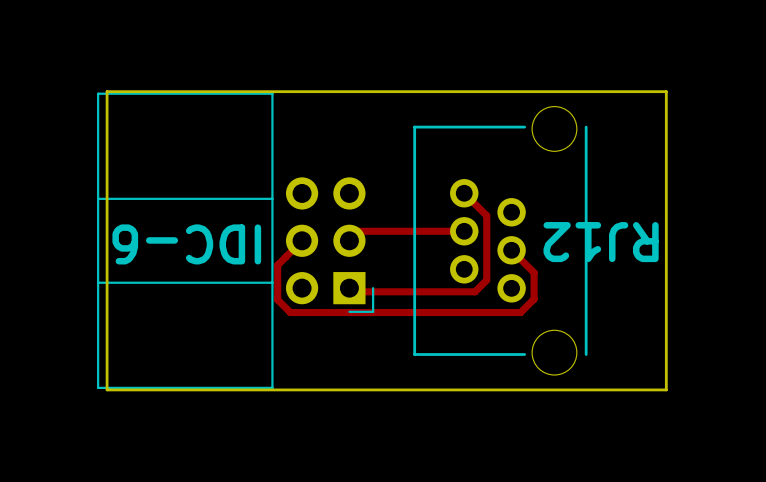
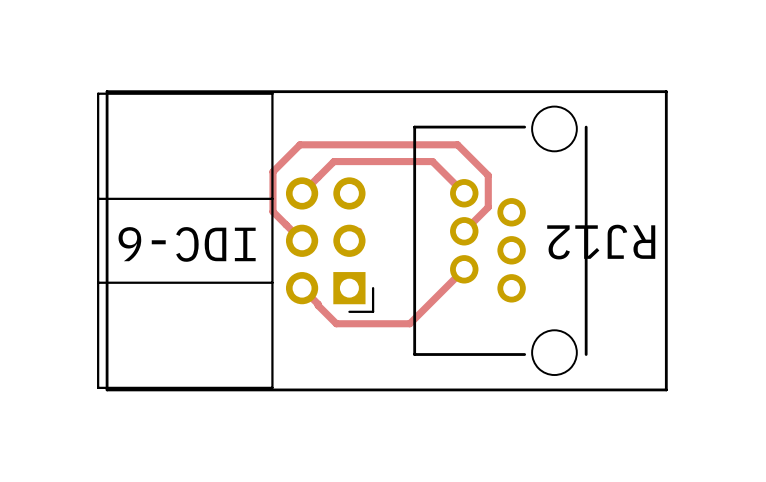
track: (464, 193) (486, 215) (486, 280) (475, 291) (354, 291) -> (464, 193) (432, 161) (333, 161) (302, 193)
track: (358, 231) (464, 231) -> none
track: (302, 240) (277, 265) (277, 299) (290, 312) (520, 312) (534, 299) (534, 272) (511, 250) -> (302, 240) (272, 211) (272, 171) (300, 144) (457, 144) (488, 175) (488, 207) (464, 231)
track: none -> (464, 269) (409, 323) (336, 323) (302, 288)

